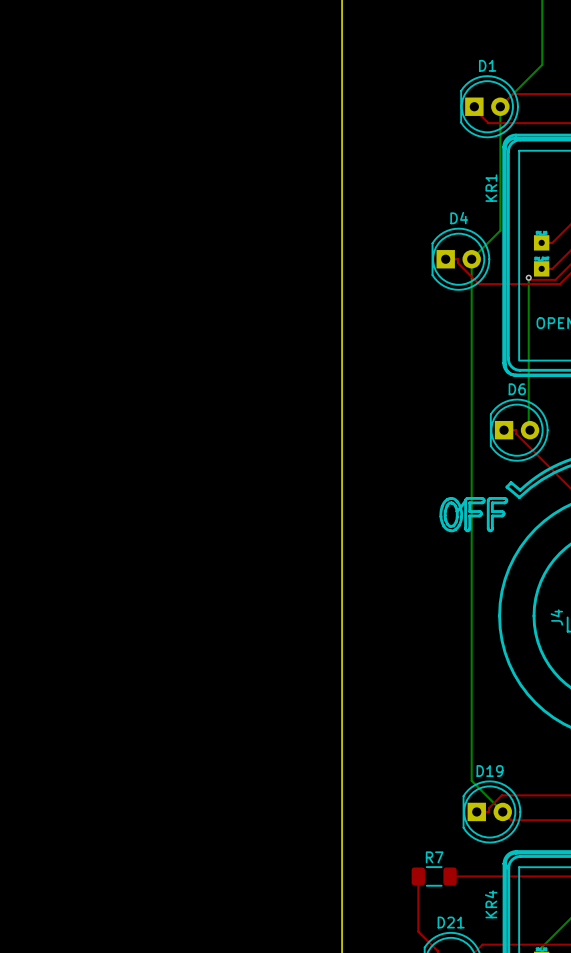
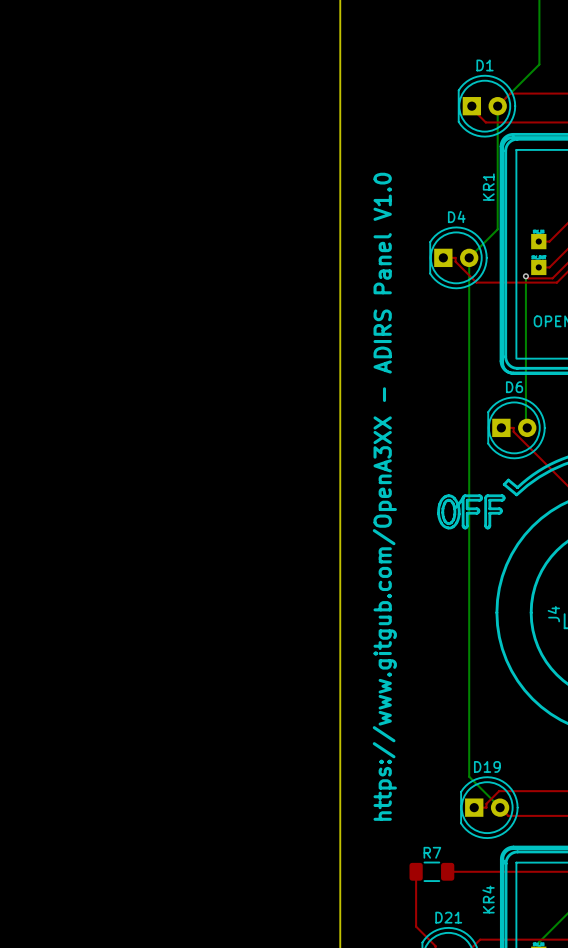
text: none -> https://www.gitgub.com/OpenA3XX - ADIRS Panel V1.0 (384, 496)

